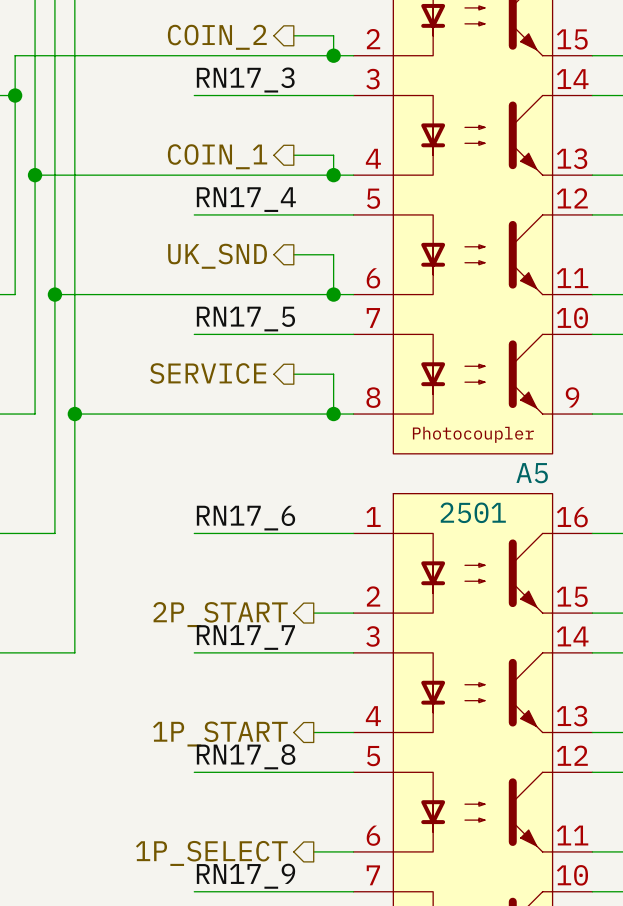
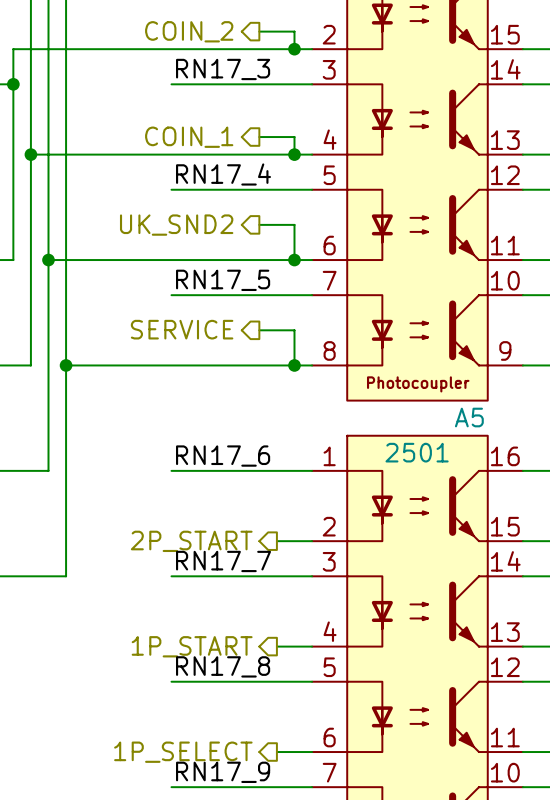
hierarchical label: UK_SND (217, 256) -> UK_SND2 (176, 225)

